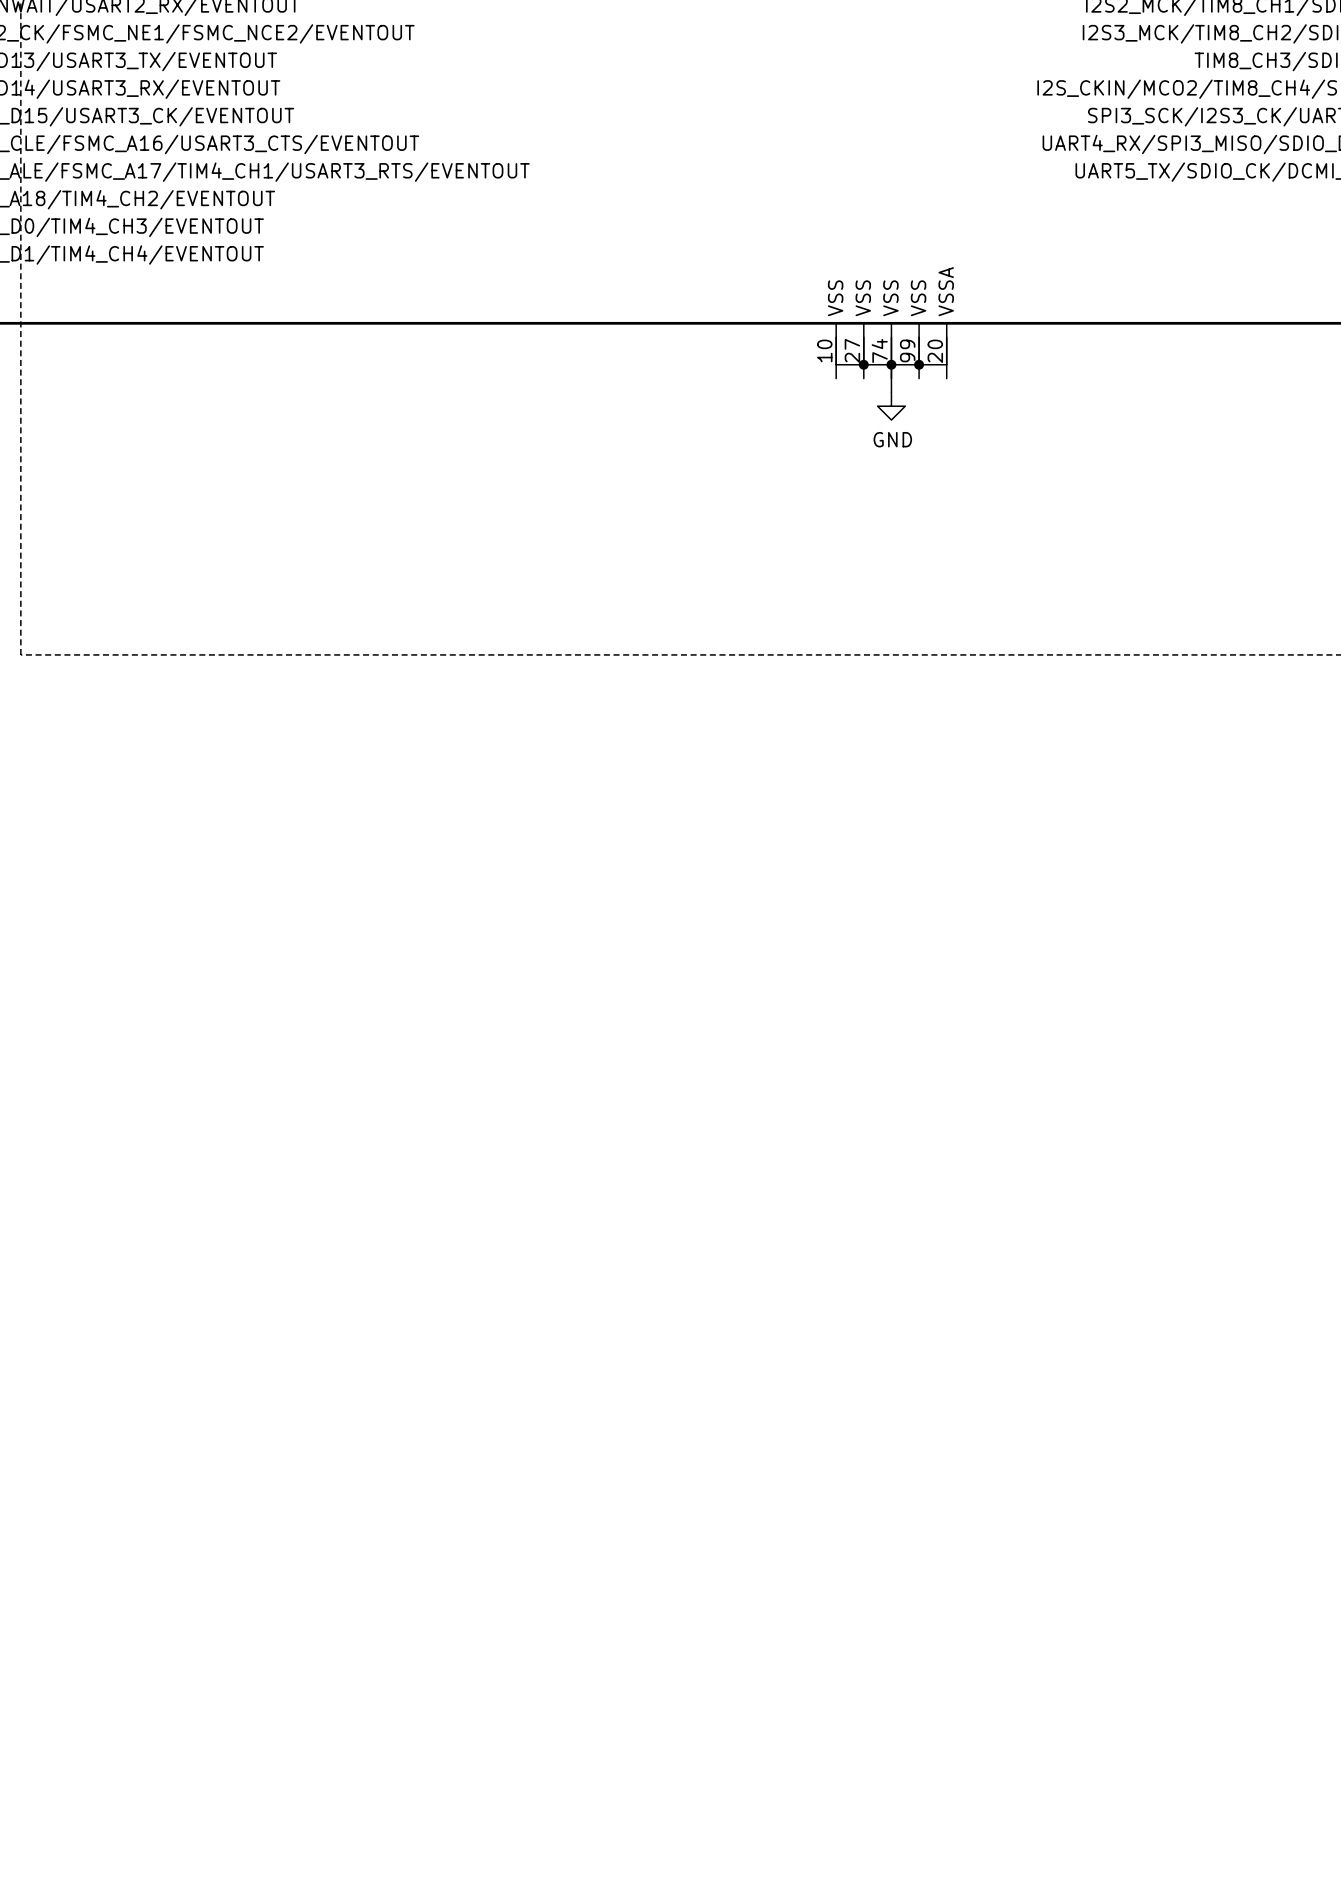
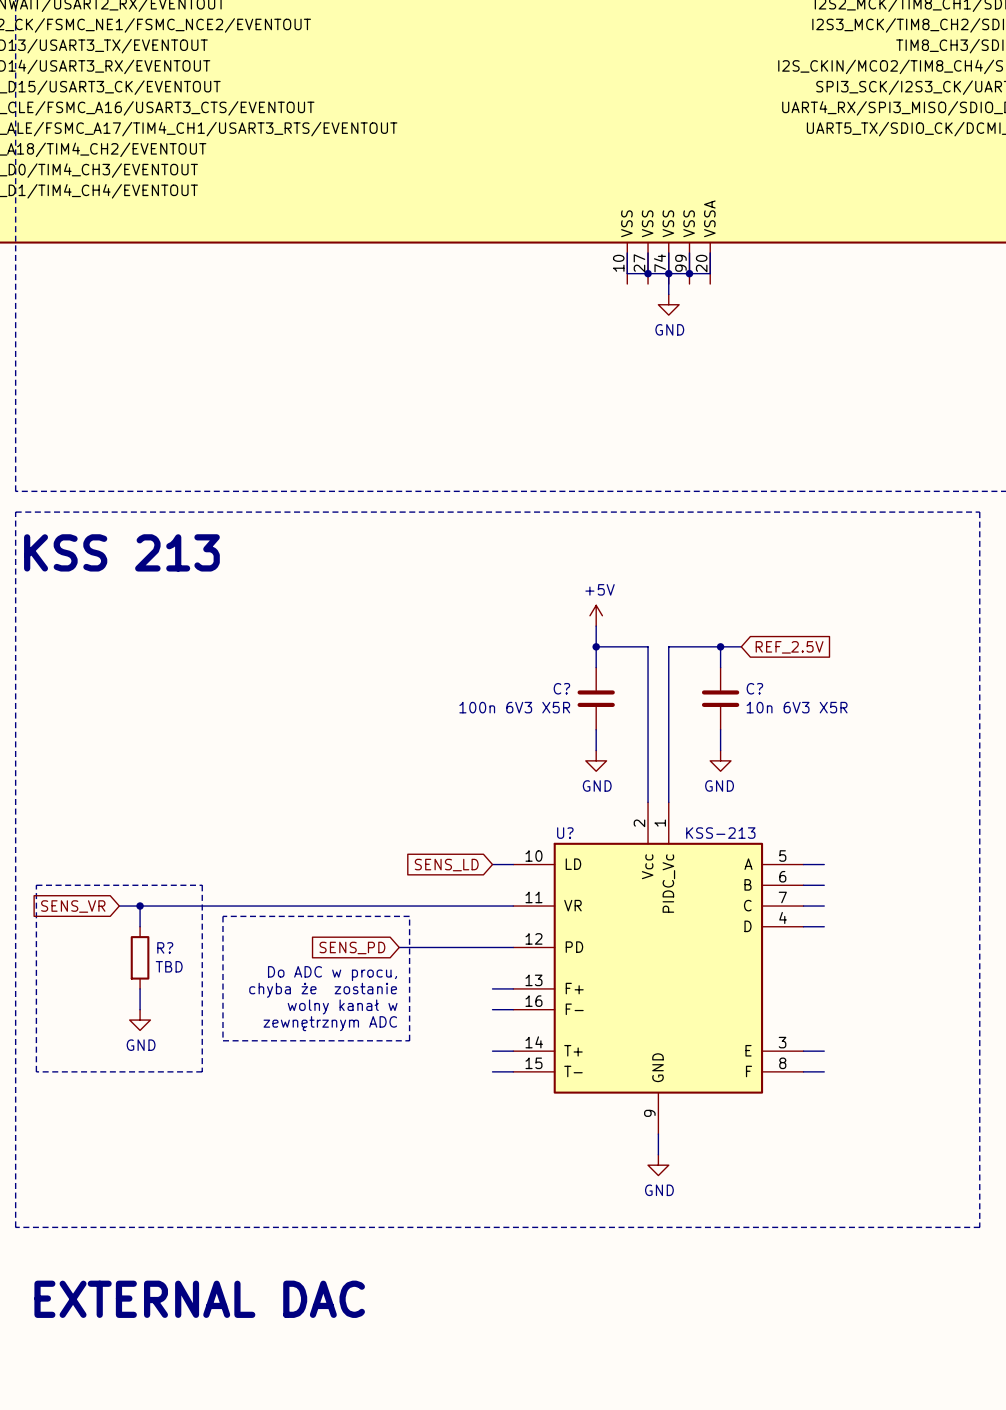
line: none -> (15, 512) (979, 512) (979, 1227) (15, 1227) (15, 512)
text: none -> KSS 213 (121, 552)
power symbol: none -> +5V (596, 615)
wire: none -> (596, 626) (596, 667)
wire: none -> (596, 646) (648, 646) (648, 802)
junction: none -> (596, 646)
wire: none -> (720, 646) (720, 667)
junction: none -> (720, 646)
wire: none -> (741, 646) (668, 646) (668, 802)
global label: none -> REF_2.5V (789, 647)
C?: none -> 100n 6V3 X5R (596, 698)
C?: none -> 10n 6V3 X5R (720, 698)
wire: none -> (596, 729) (596, 750)
wire: none -> (720, 729) (720, 750)
power symbol: none -> GND (596, 760)
power symbol: none -> GND (720, 760)
wire: none -> (492, 864) (513, 864)
wire: none -> (803, 864) (824, 864)
global label: none -> SENS_LD (446, 865)
line: none -> (36, 885) (202, 885) (202, 1071) (36, 1071) (36, 885)
wire: none -> (803, 885) (824, 885)
wire: none -> (119, 906) (513, 906)
wire: none -> (140, 906) (140, 926)
junction: none -> (140, 906)
wire: none -> (803, 906) (824, 906)
global label: none -> SENS_VR (73, 906)
line: none -> (222, 916) (409, 916) (409, 1040) (222, 1040) (222, 916)
wire: none -> (803, 926) (824, 926)
wire: none -> (399, 947) (513, 947)
global label: none -> SENS_PD (352, 947)
R?: none -> TBD (140, 957)
U?: none -> KSS-213 (658, 968)
text: none -> Do ADC w procu, (332, 973)
wire: none -> (140, 988) (140, 1009)
wire: none -> (492, 988) (513, 988)
text: none -> chyba że zostanie (323, 990)
text: none -> wolny kanał w (342, 1006)
wire: none -> (492, 1009) (513, 1009)
power symbol: none -> GND (140, 1020)
text: none -> zewnętrznym ADC (330, 1023)
wire: none -> (492, 1051) (513, 1051)
wire: none -> (803, 1051) (824, 1051)
wire: none -> (492, 1071) (513, 1071)
wire: none -> (803, 1071) (824, 1071)
wire: none -> (658, 1134) (658, 1154)
power symbol: none -> GND (658, 1165)
text: none -> EXTERNAL DAC (199, 1299)

